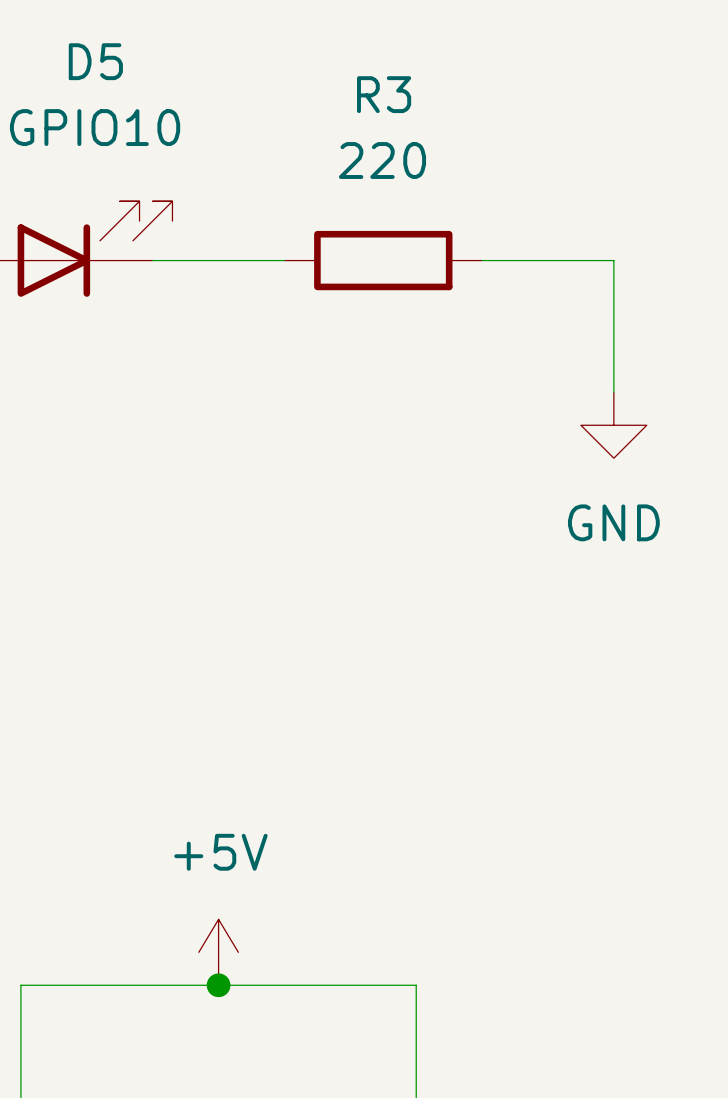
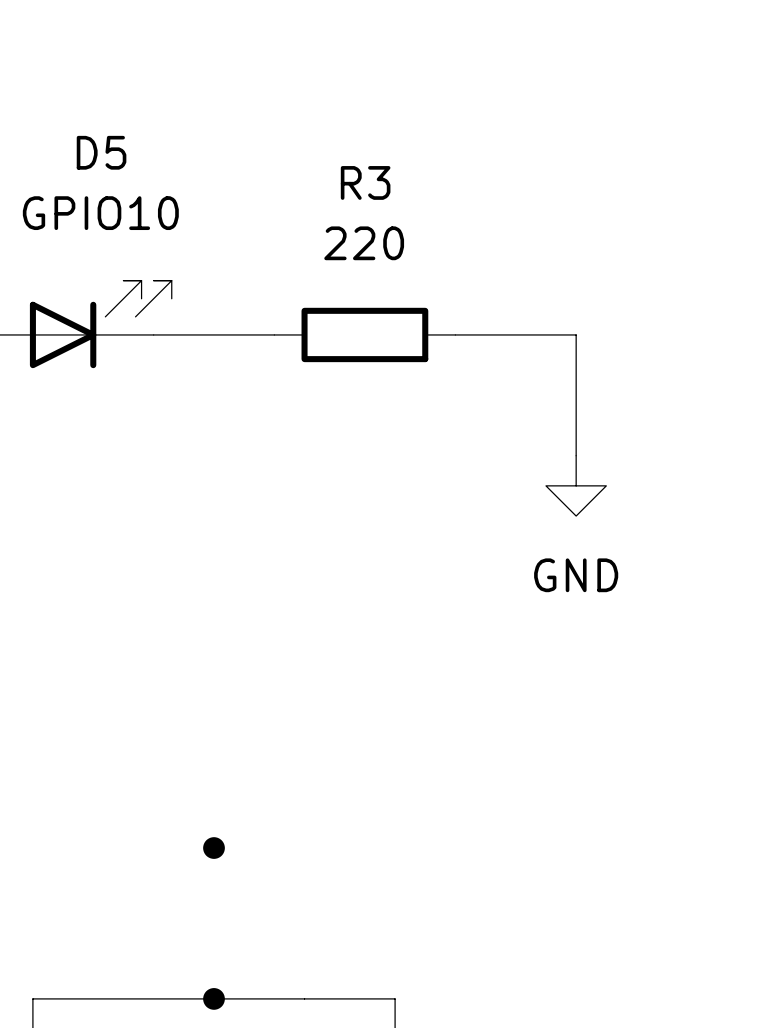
junction: none -> (214, 848)
power symbol: +5V (218, 952) -> none

